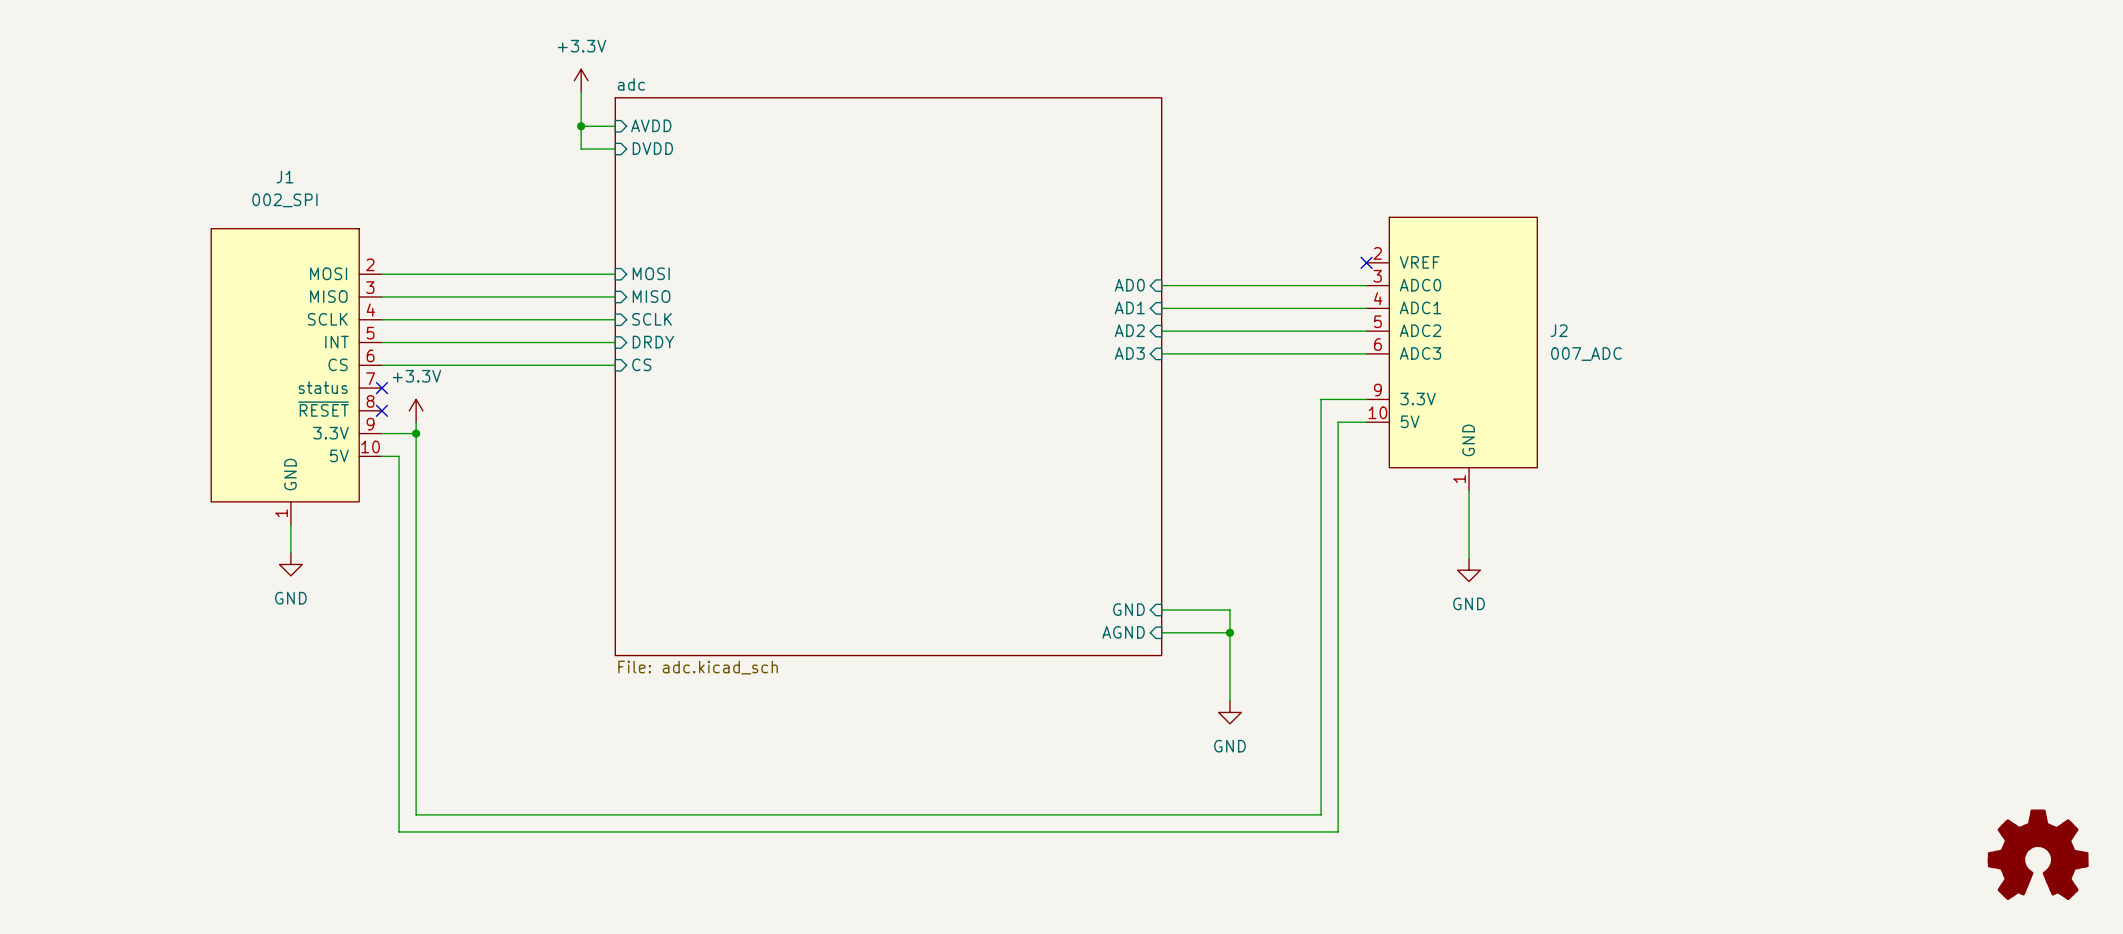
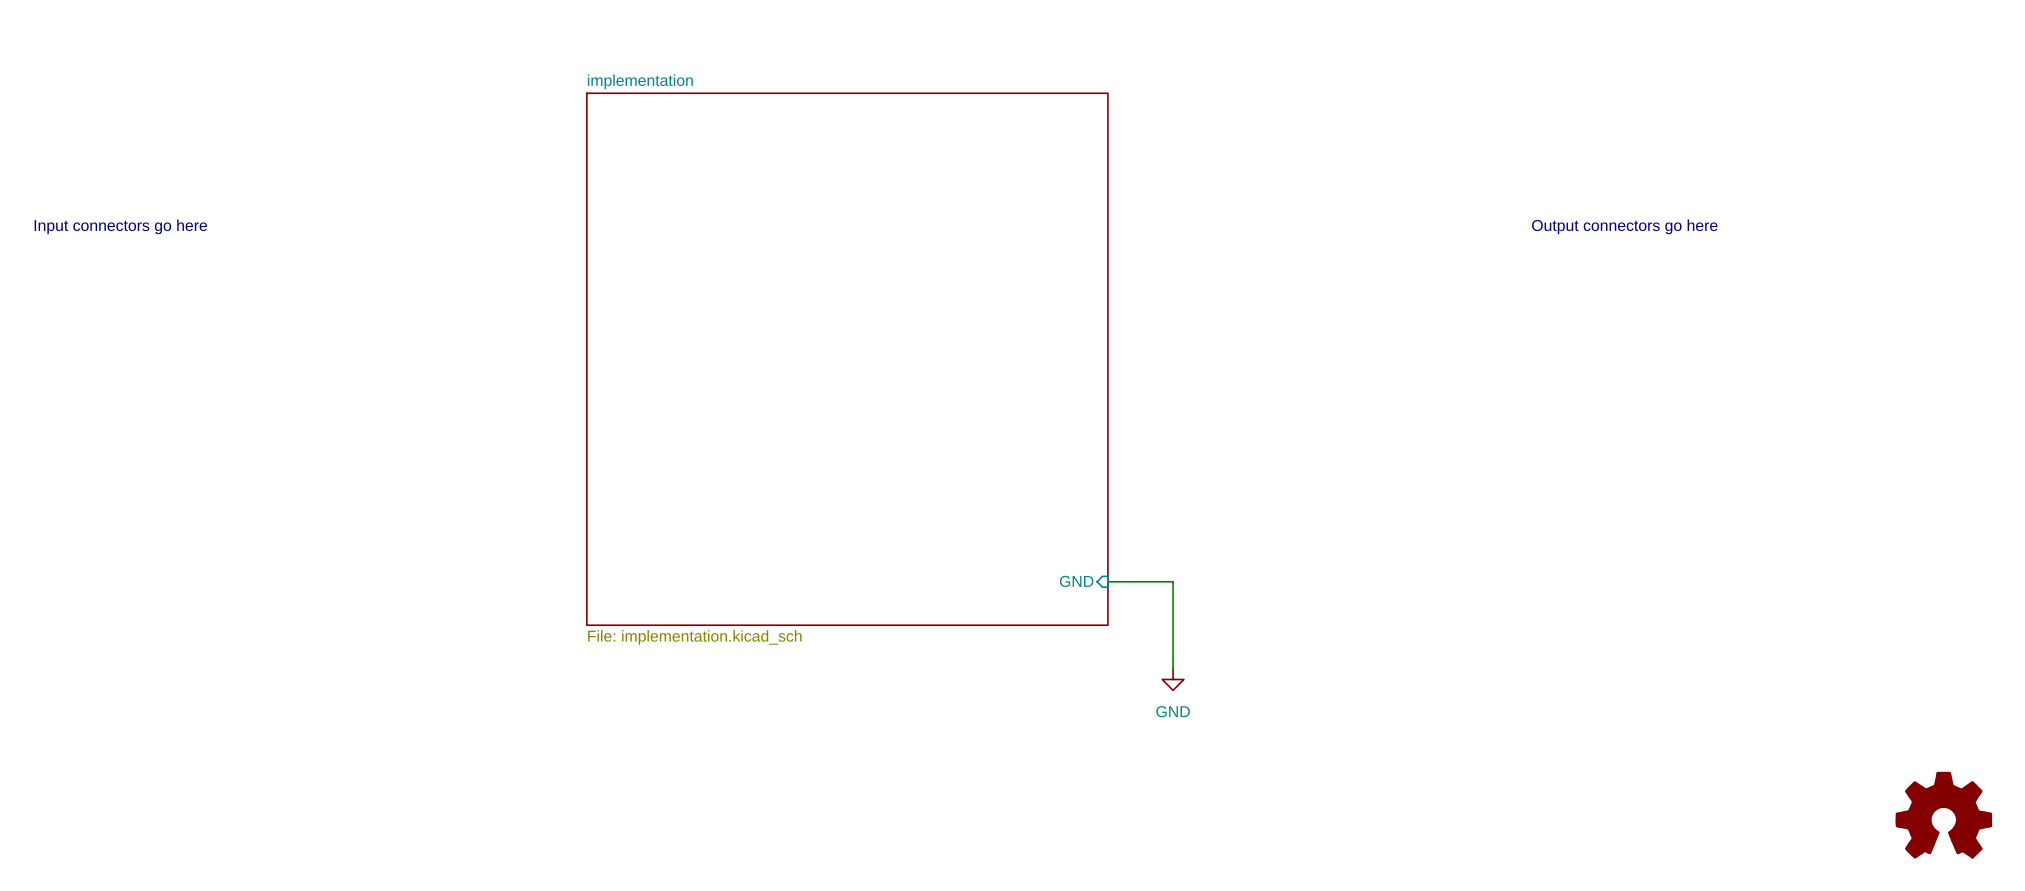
power symbol: +3.3V (581, 80) -> none
sheet adc name: adc (631, 84) -> implementation (640, 81)
wire: (581, 92) (581, 149) (615, 149) -> none
sheet pin: AVDD (651, 125) -> none
wire: (581, 126) (615, 126) -> none
junction: (581, 126) -> none
sheet pin: DVDD (652, 148) -> none
text: none -> Input connectors go here (120, 226)
text: none -> Output connectors go here (1624, 226)
no-connect mark: (1366, 262) -> none
sheet pin: MOSI (651, 273) -> none
wire: (381, 274) (615, 274) -> none
sheet pin: AD0 (1129, 285) -> none
wire: (1161, 285) (1366, 285) -> none
wire: (381, 296) (615, 296) -> none
sheet pin: MISO (651, 296) -> none
sheet pin: AD1 (1129, 307) -> none
wire: (1161, 308) (1366, 308) -> none
wire: (381, 319) (615, 319) -> none
sheet pin: SCLK (652, 319) -> none
sheet pin: AD2 (1129, 330) -> none
wire: (1161, 331) (1366, 331) -> none
wire: (381, 342) (615, 342) -> none
sheet pin: DRDY (653, 342) -> none
sheet pin: AD3 (1129, 353) -> none
wire: (1161, 353) (1366, 353) -> none
J2: 007_ADC (1451, 353) -> none
sheet pin: CS (641, 364) -> none
wire: (381, 365) (615, 365) -> none
J1: 002_SPI (296, 376) -> none
no-connect mark: (381, 388) -> none
wire: (1366, 399) (1321, 399) (1321, 814) (416, 814) (416, 422) -> none
no-connect mark: (381, 410) -> none
power symbol: +3.3V (416, 410) -> none
wire: (1366, 422) (1338, 422) (1338, 831) (399, 831) (399, 456) (381, 456) -> none
wire: (381, 433) (416, 433) -> none
junction: (416, 433) -> none
wire: (1469, 490) (1469, 558) -> none
wire: (290, 524) (290, 553) -> none
power symbol: GND (290, 564) -> none
power symbol: GND (1469, 570) -> none
sheet pin: AGND (1123, 632) -> none
wire: (1161, 632) (1229, 632) -> none
junction: (1229, 632) -> none
sheet adc value: File: adc.kicad_sch (698, 667) -> File: implementation.kicad_sch (694, 637)

